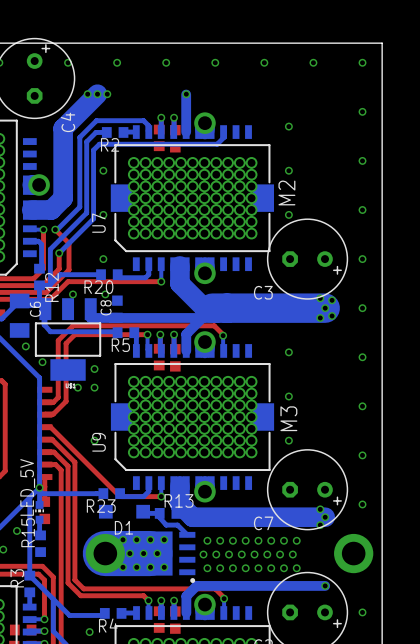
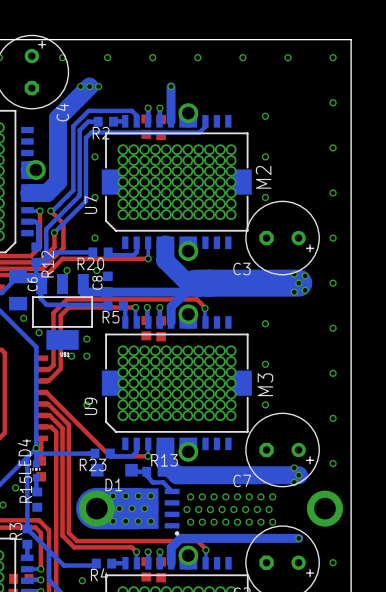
LED_5V name: LED_5V (27, 487) -> LED4 (24, 456)

